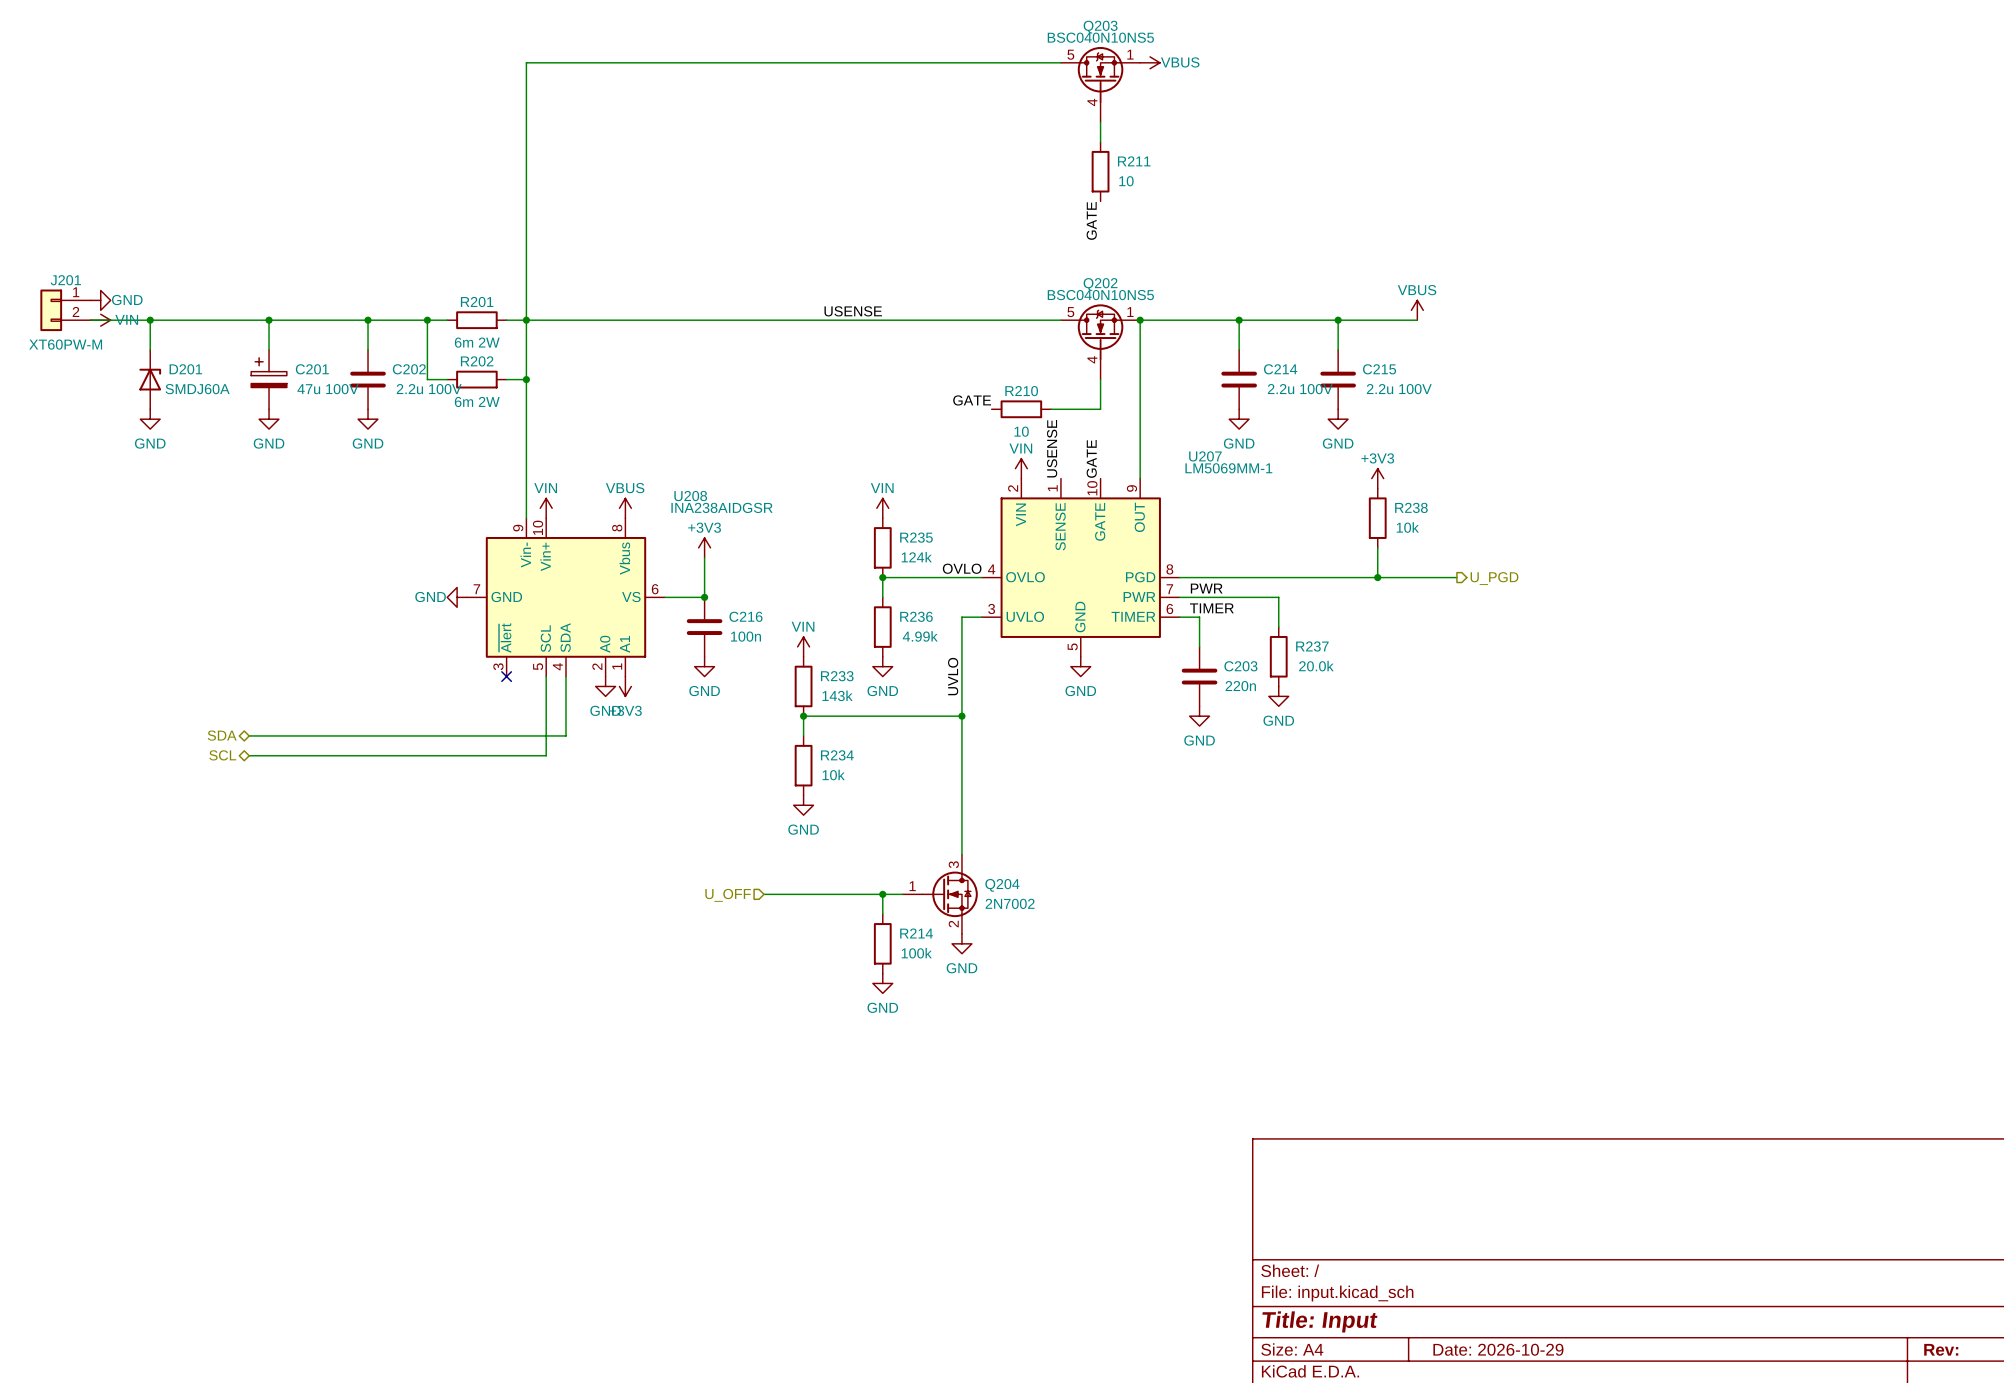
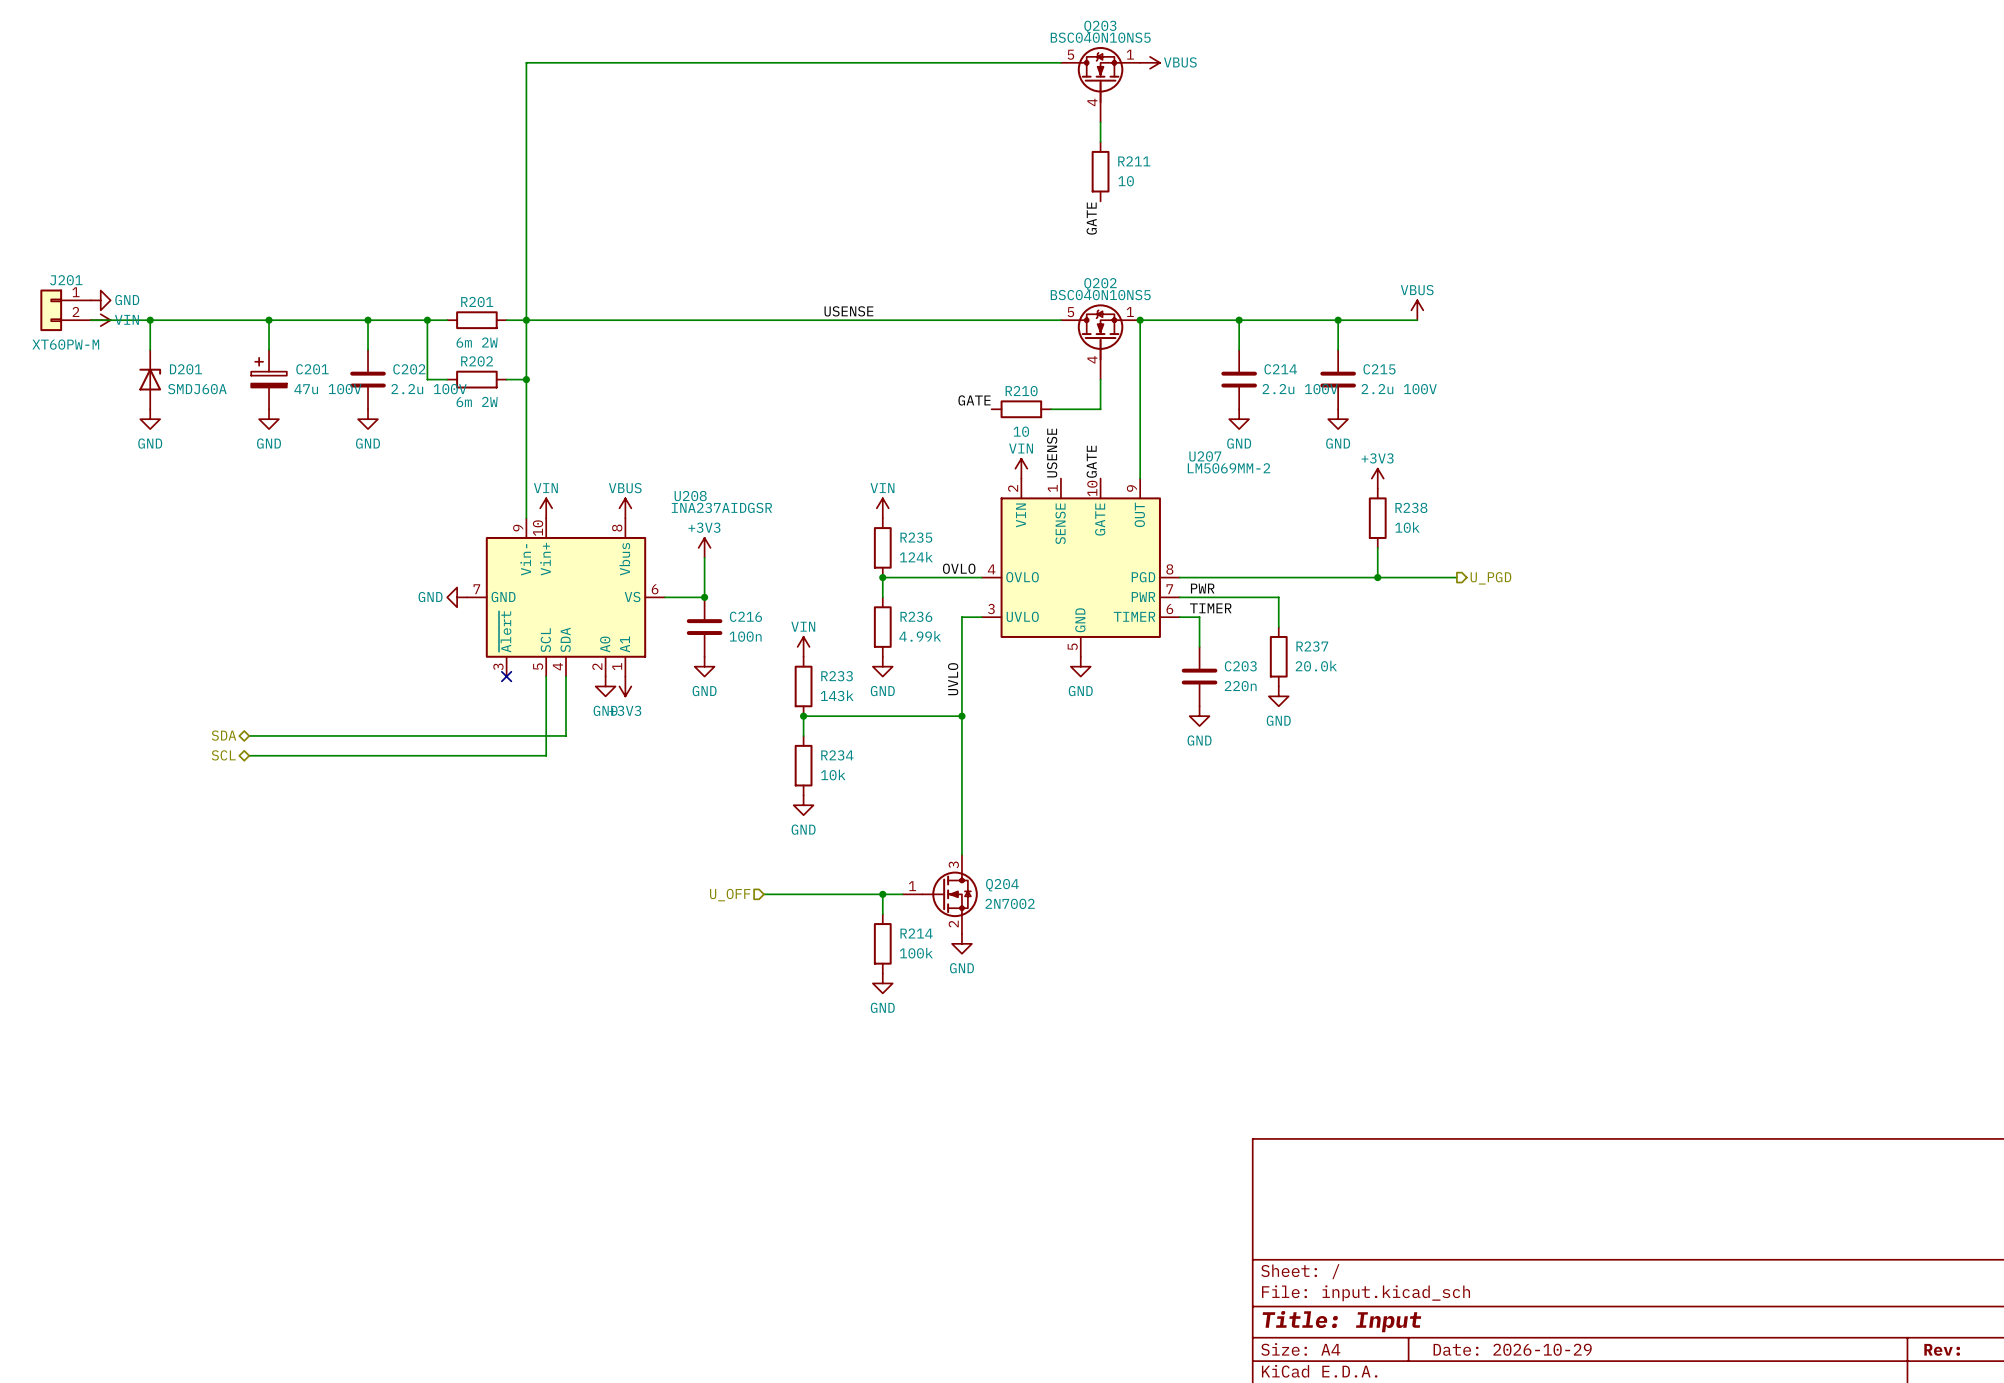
U207 value: LM5069MM-1 (1228, 468) -> LM5069MM-2 (1229, 468)
U208 value: INA238AIDGSR (721, 507) -> INA237AIDGSR (721, 507)

